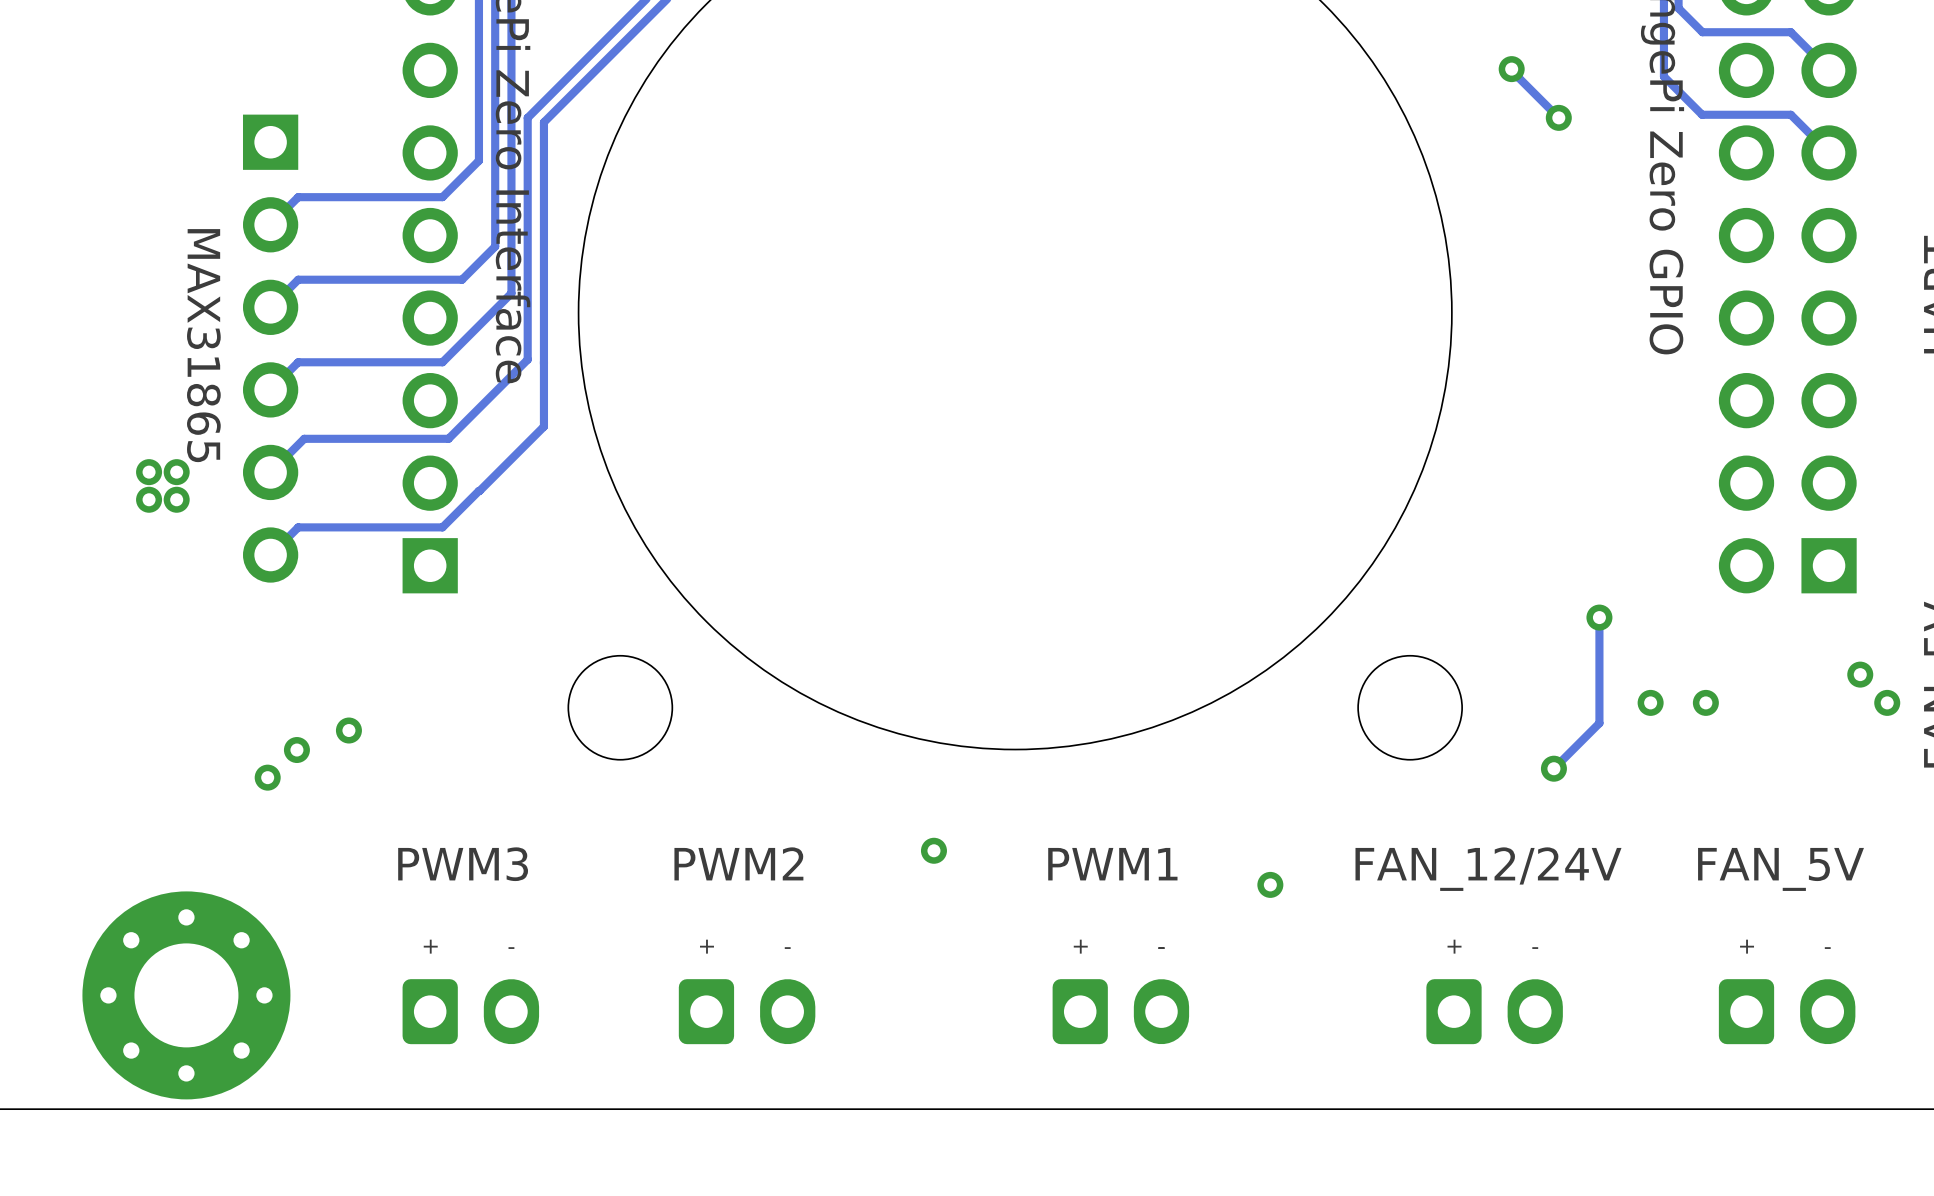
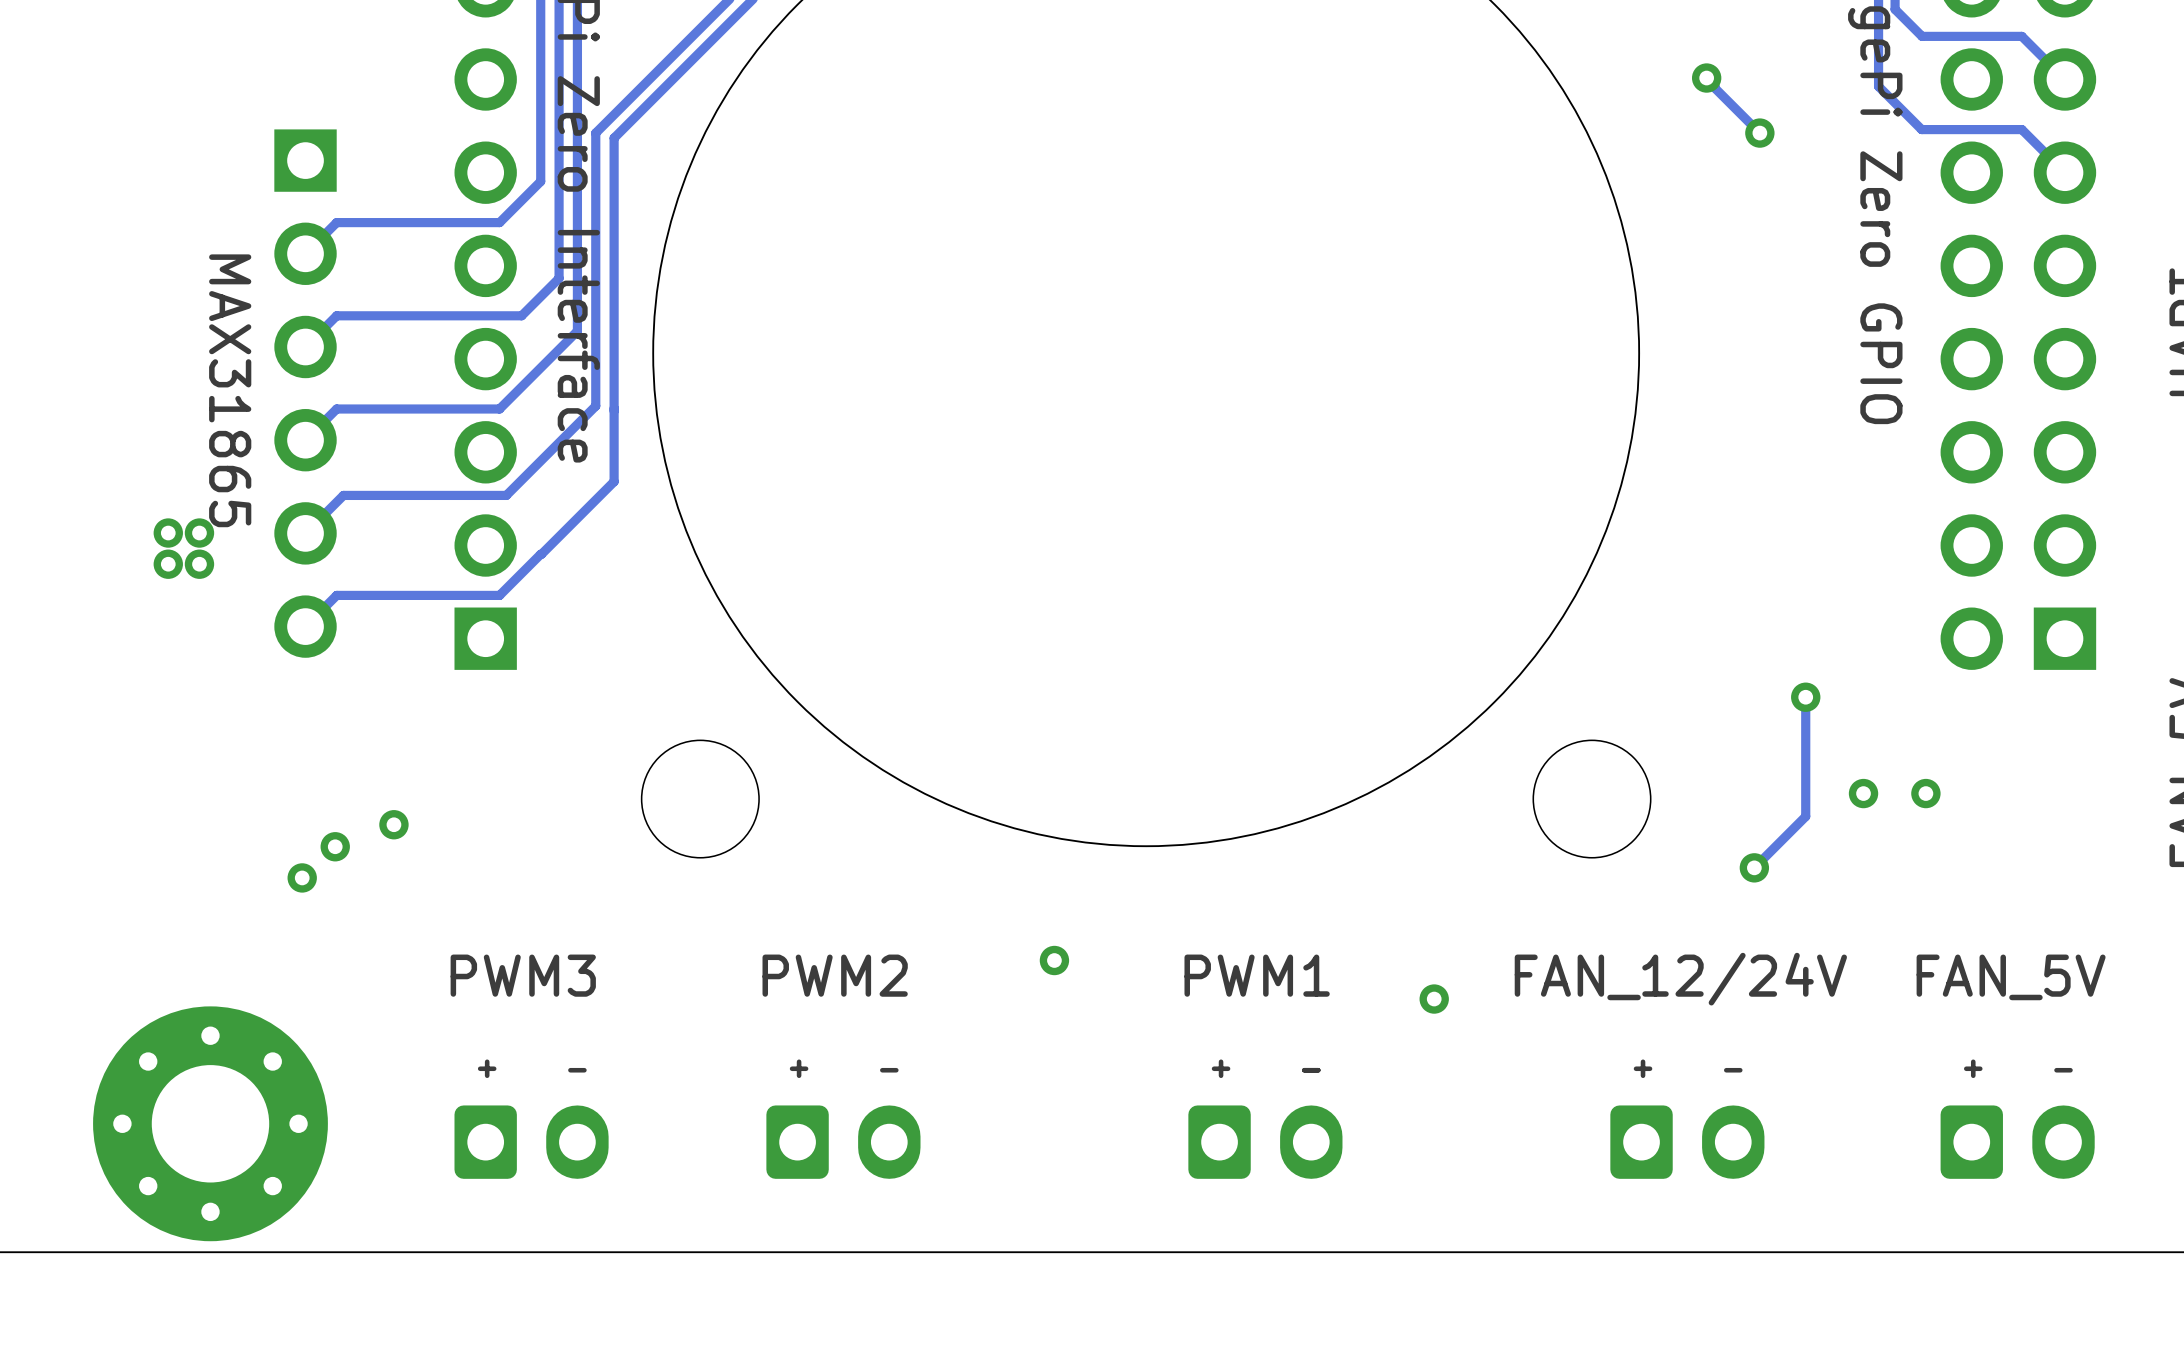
via: (1860, 674) -> none
via: (1887, 702) -> none

